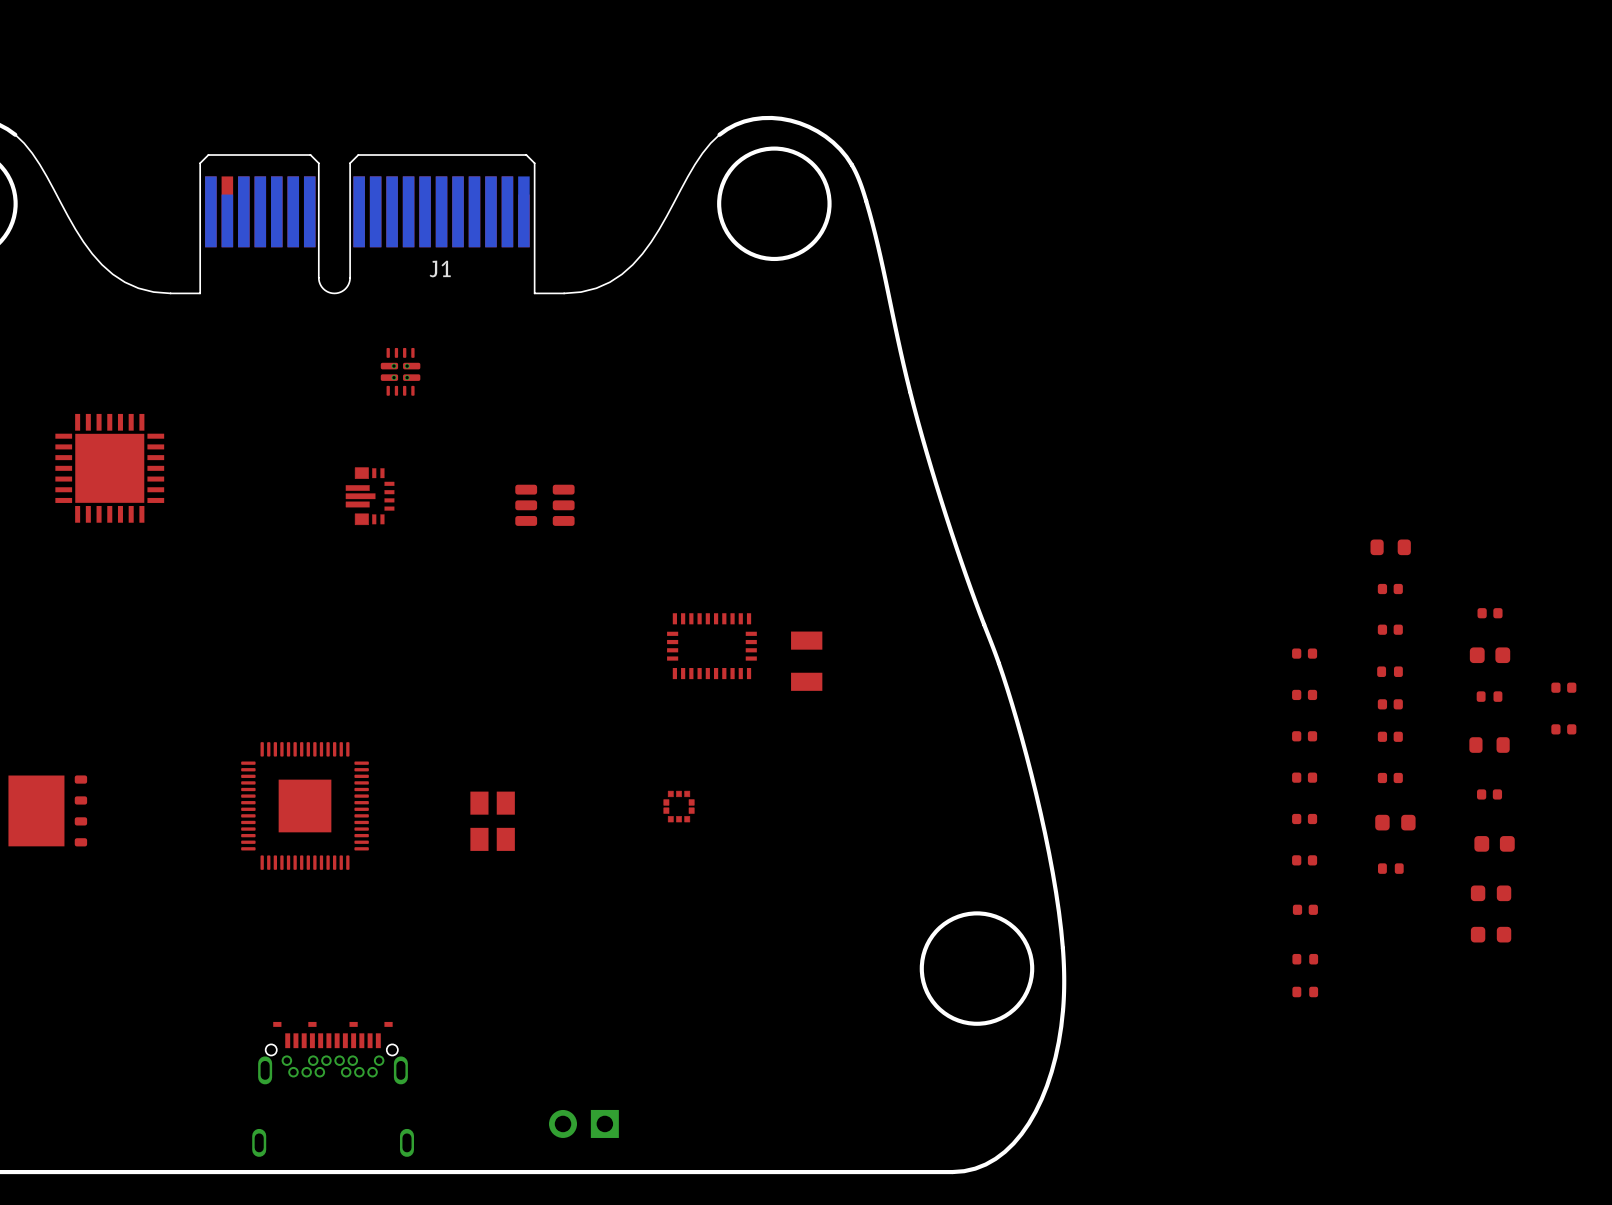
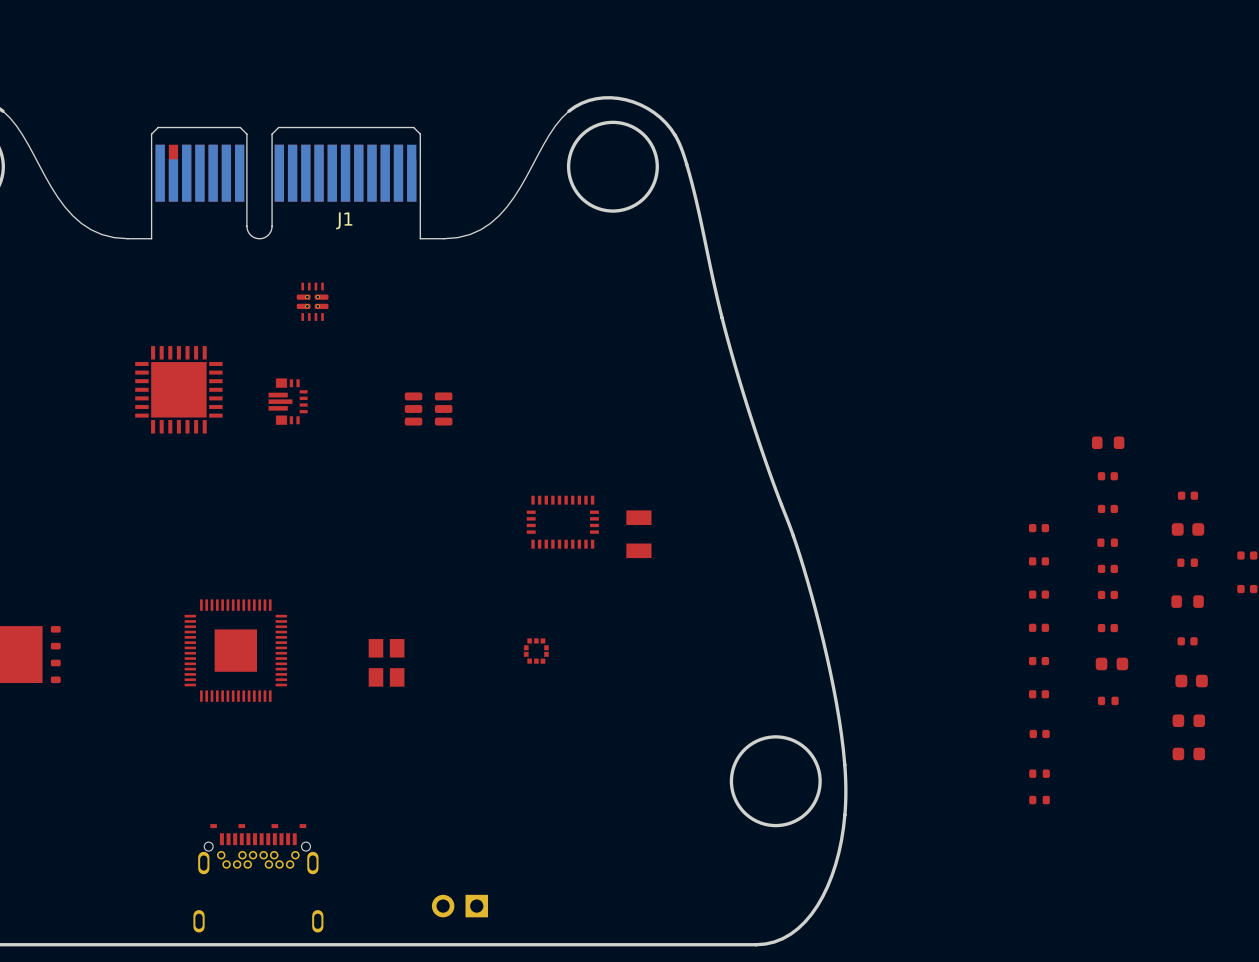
part position: (109, 468) -> (178, 389)

